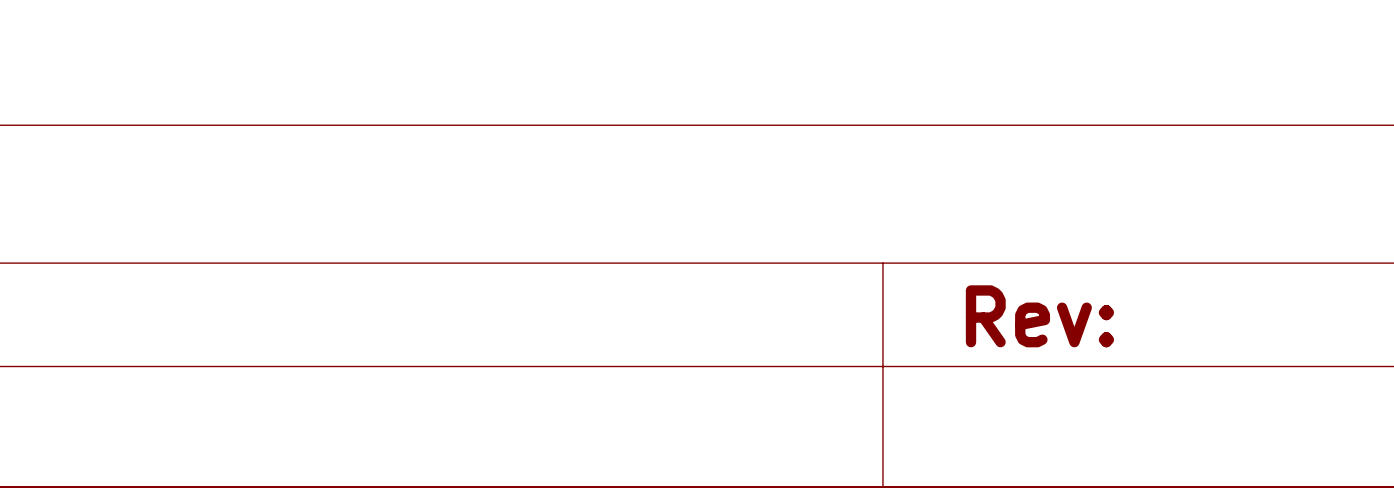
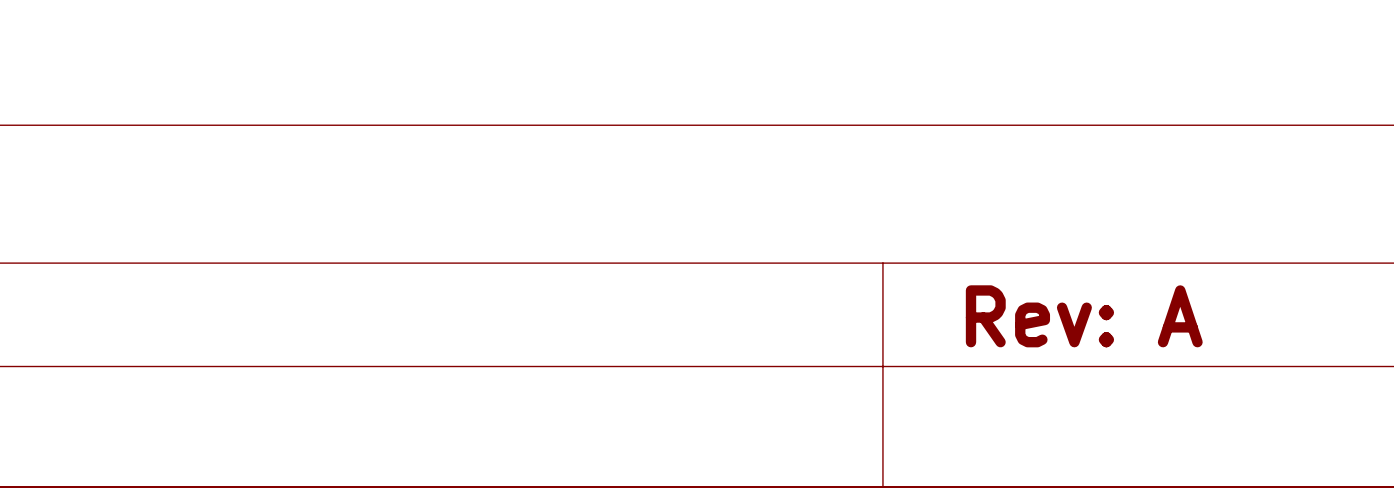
title block: Rev: (1039, 316) -> Rev: A (1084, 316)

